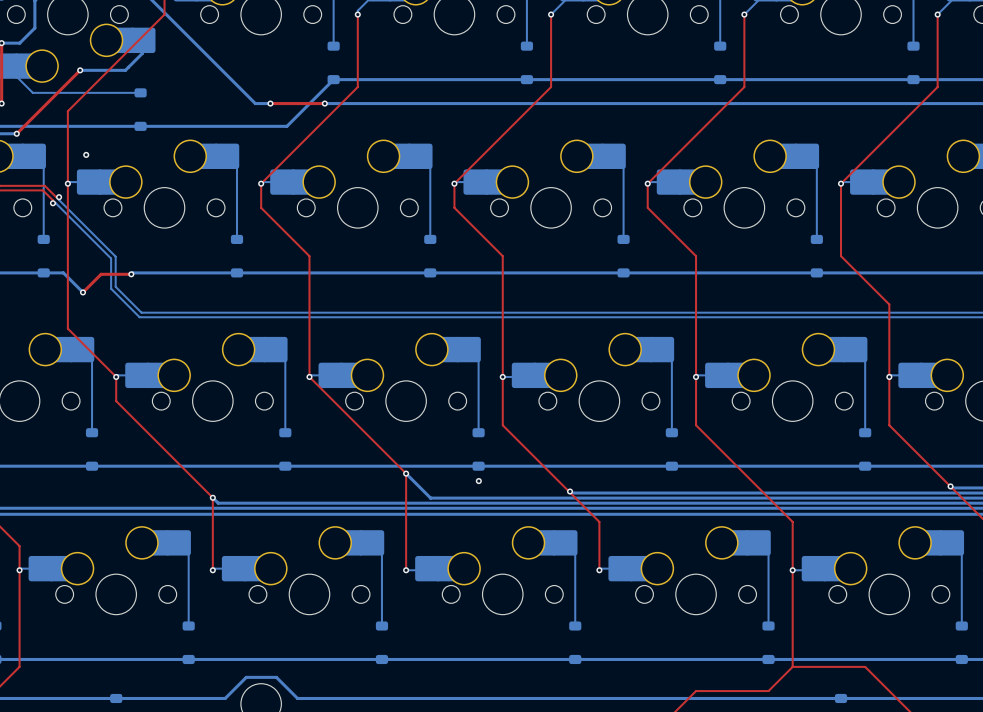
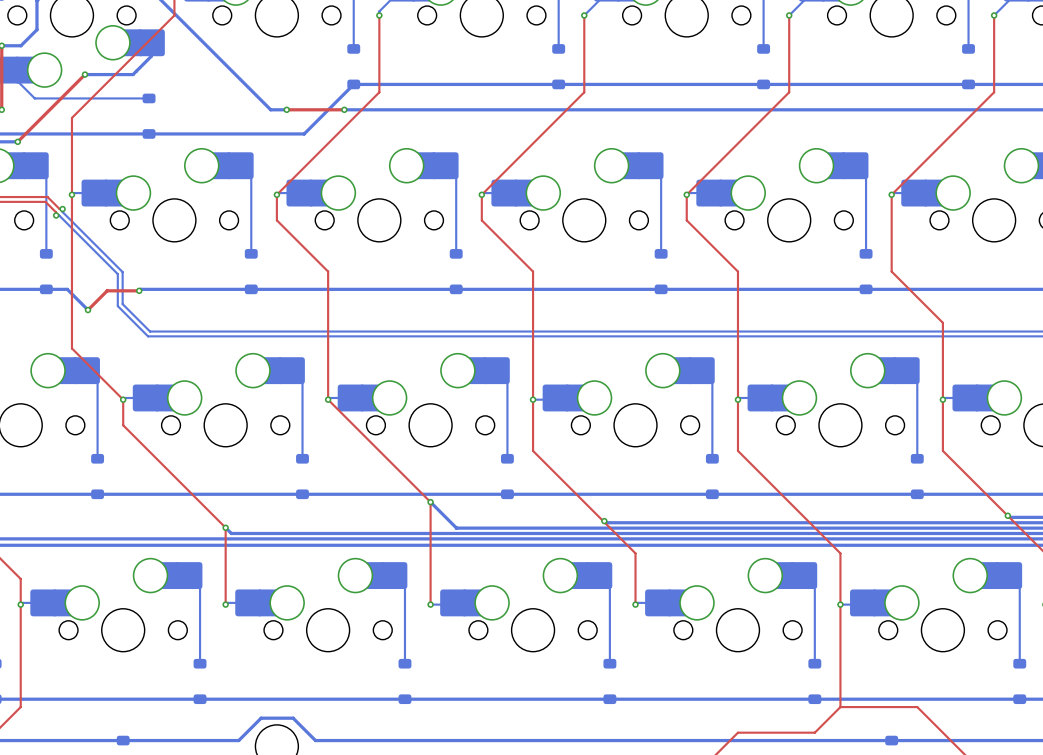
via: (86, 154) -> none
via: (478, 481) -> none

